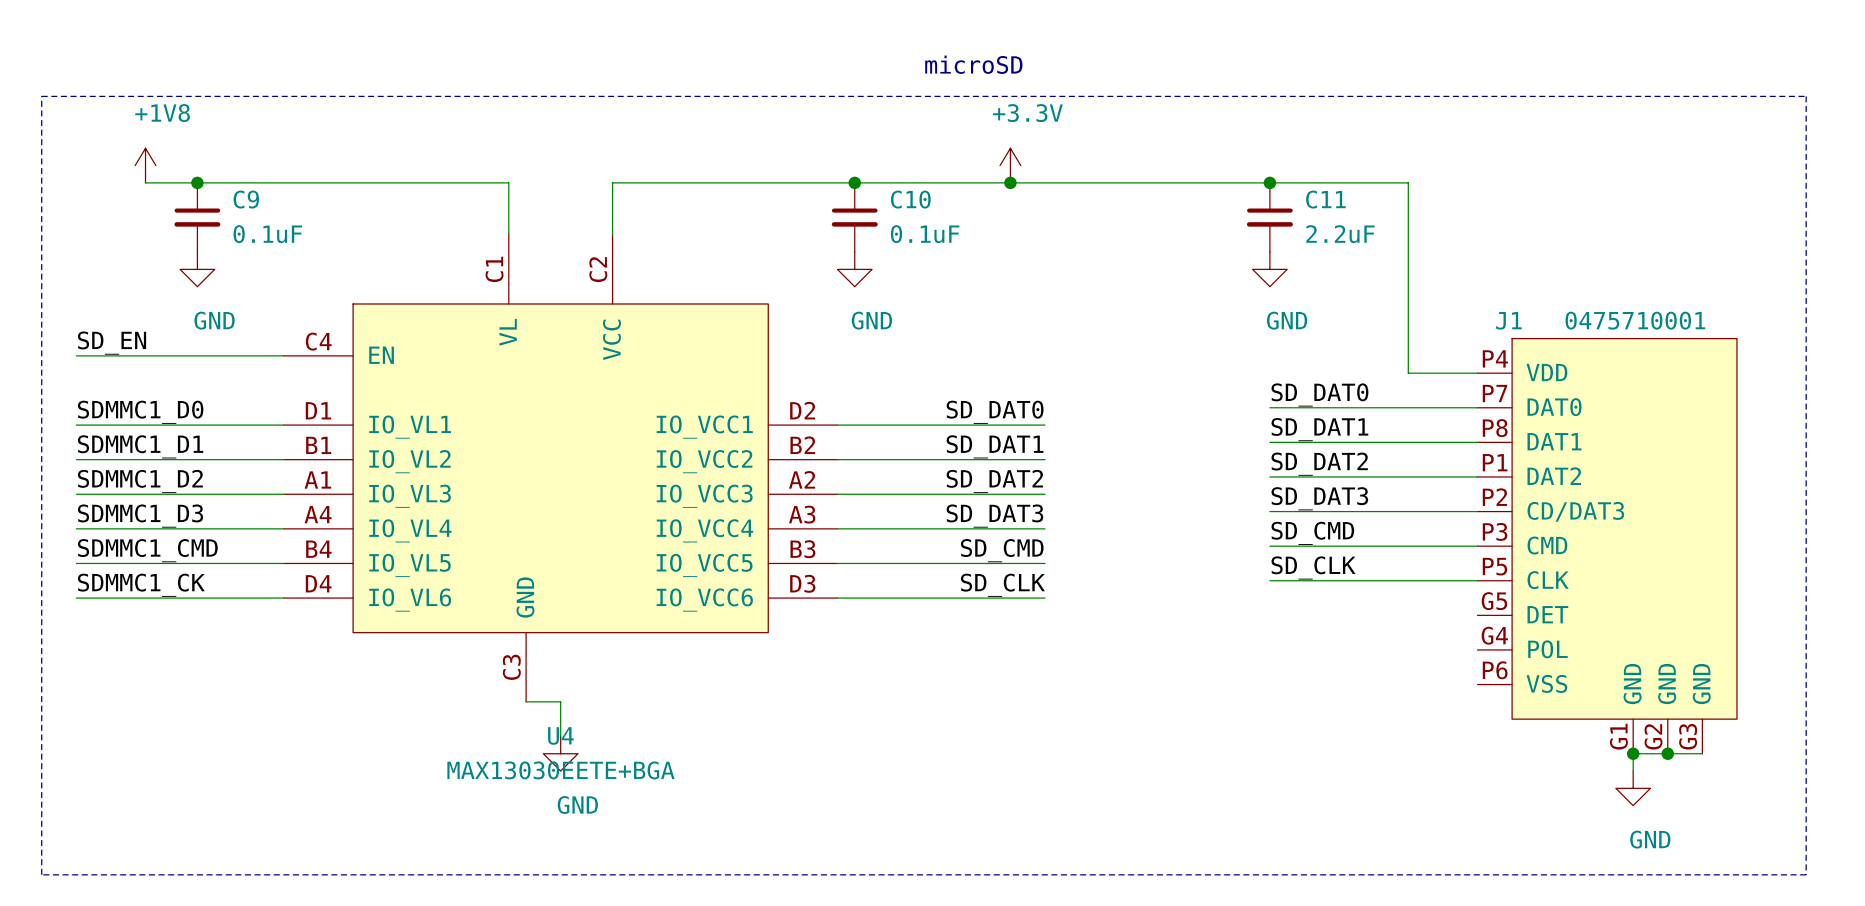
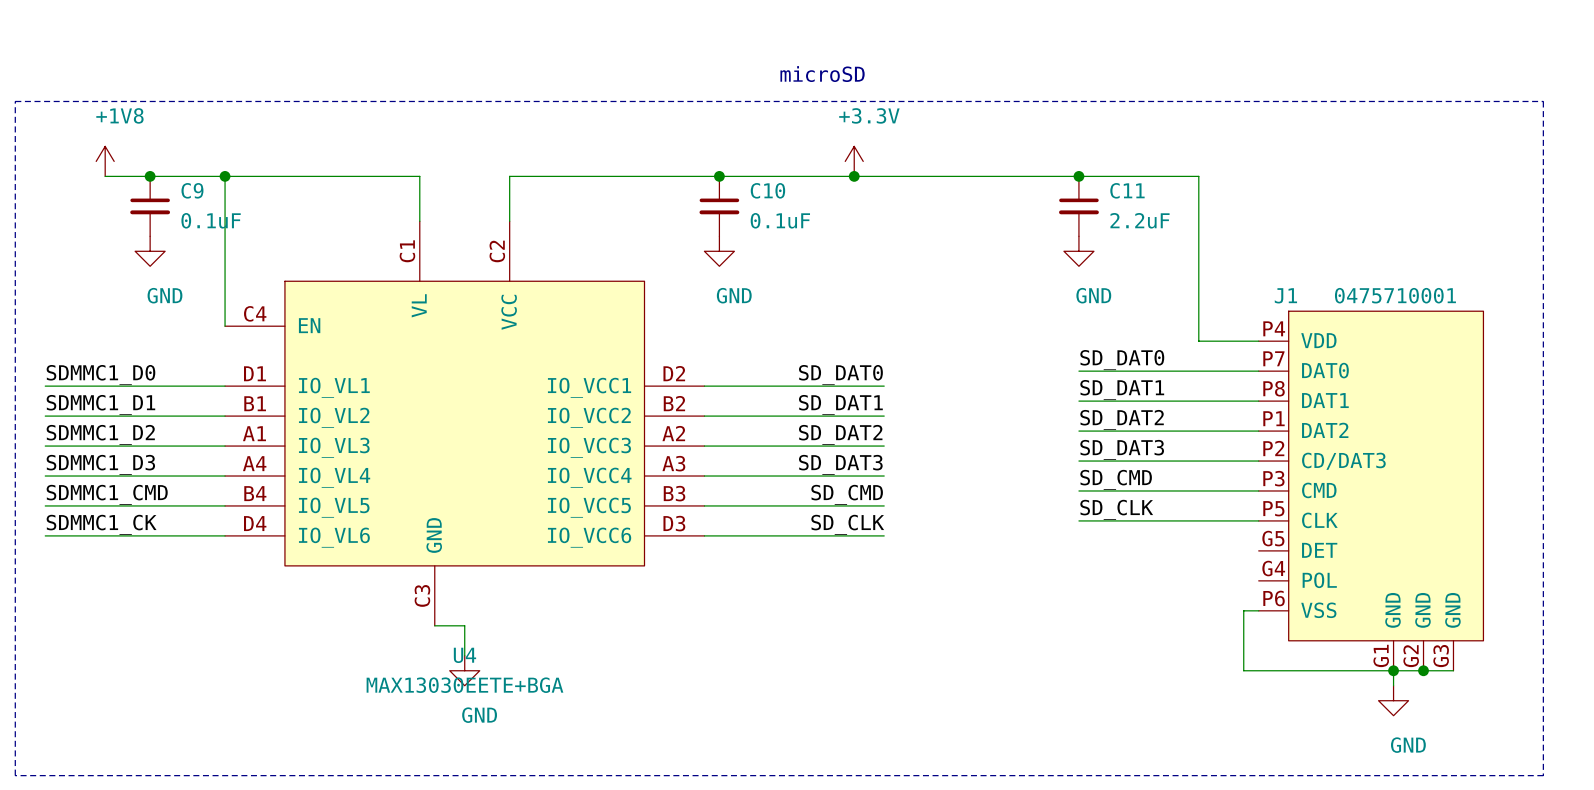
junction: none -> (225, 176)
label: SD_EN (112, 343) -> none
wire: (76, 355) (283, 355) -> (225, 176) (225, 326)
wire: none -> (1258, 610) (1243, 610) (1243, 670) (1393, 670)

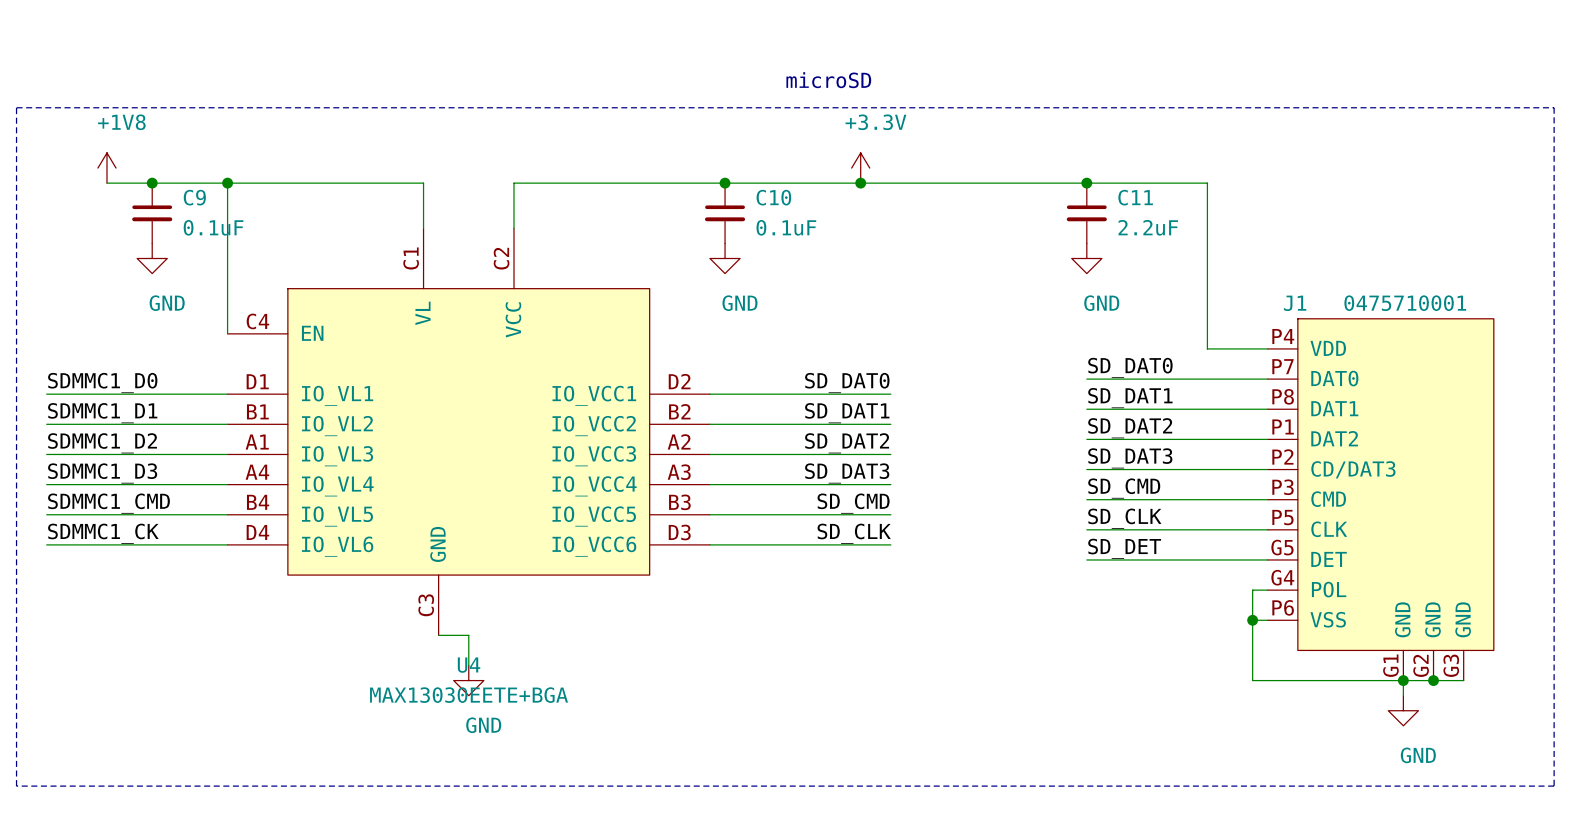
label: none -> SD_DET (1124, 548)
wire: none -> (1086, 559) (1267, 559)
wire: none -> (1267, 590) (1252, 590) (1252, 620)
junction: none -> (1252, 620)

